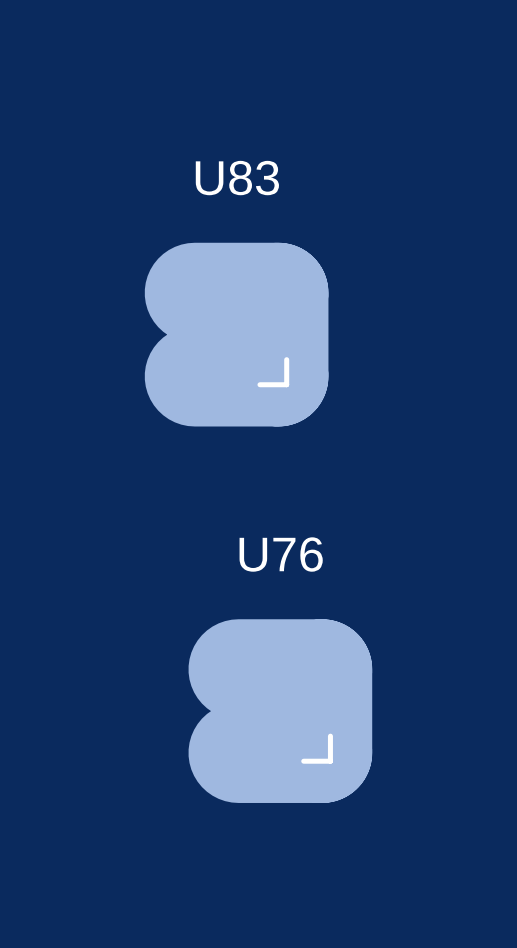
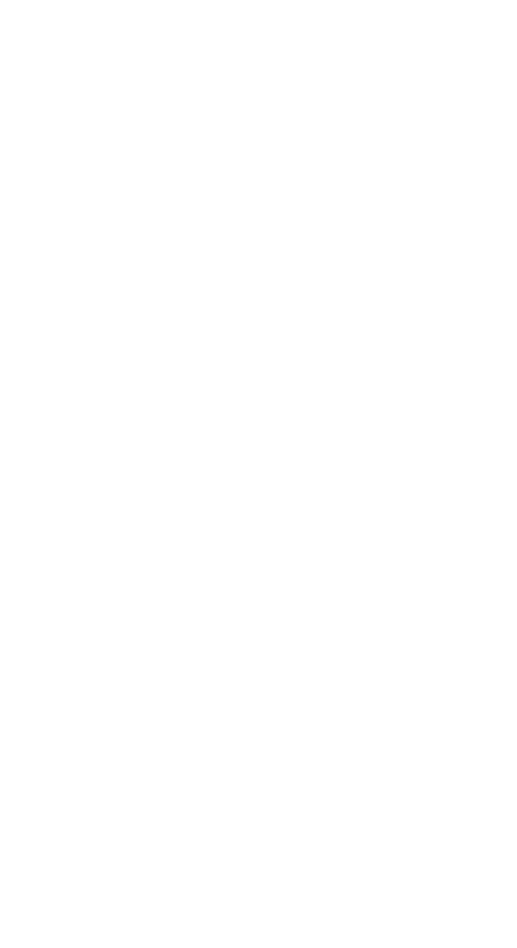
U83: (236, 334) -> none
U76: (280, 711) -> none

